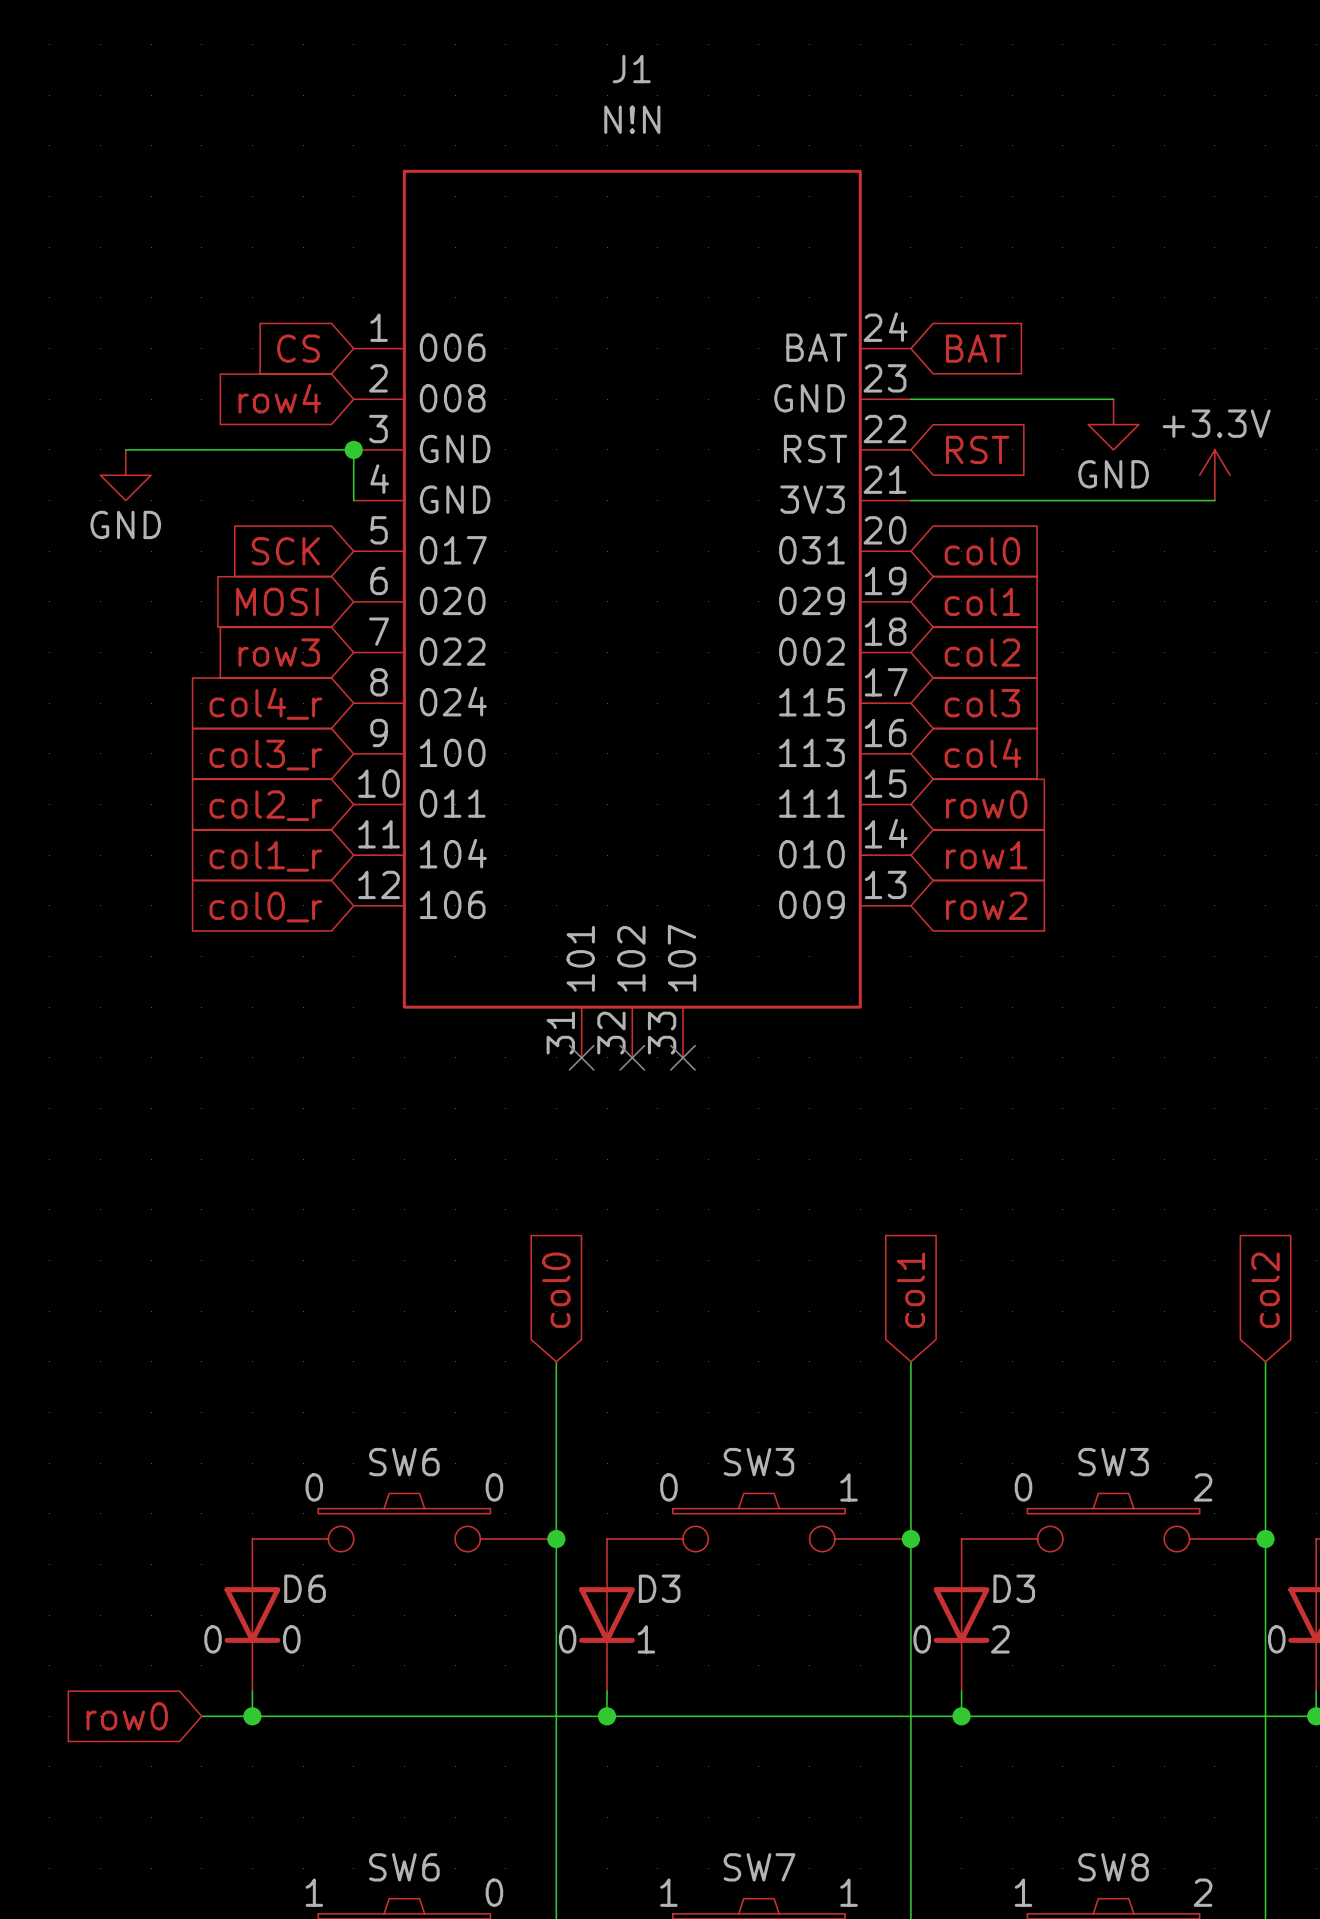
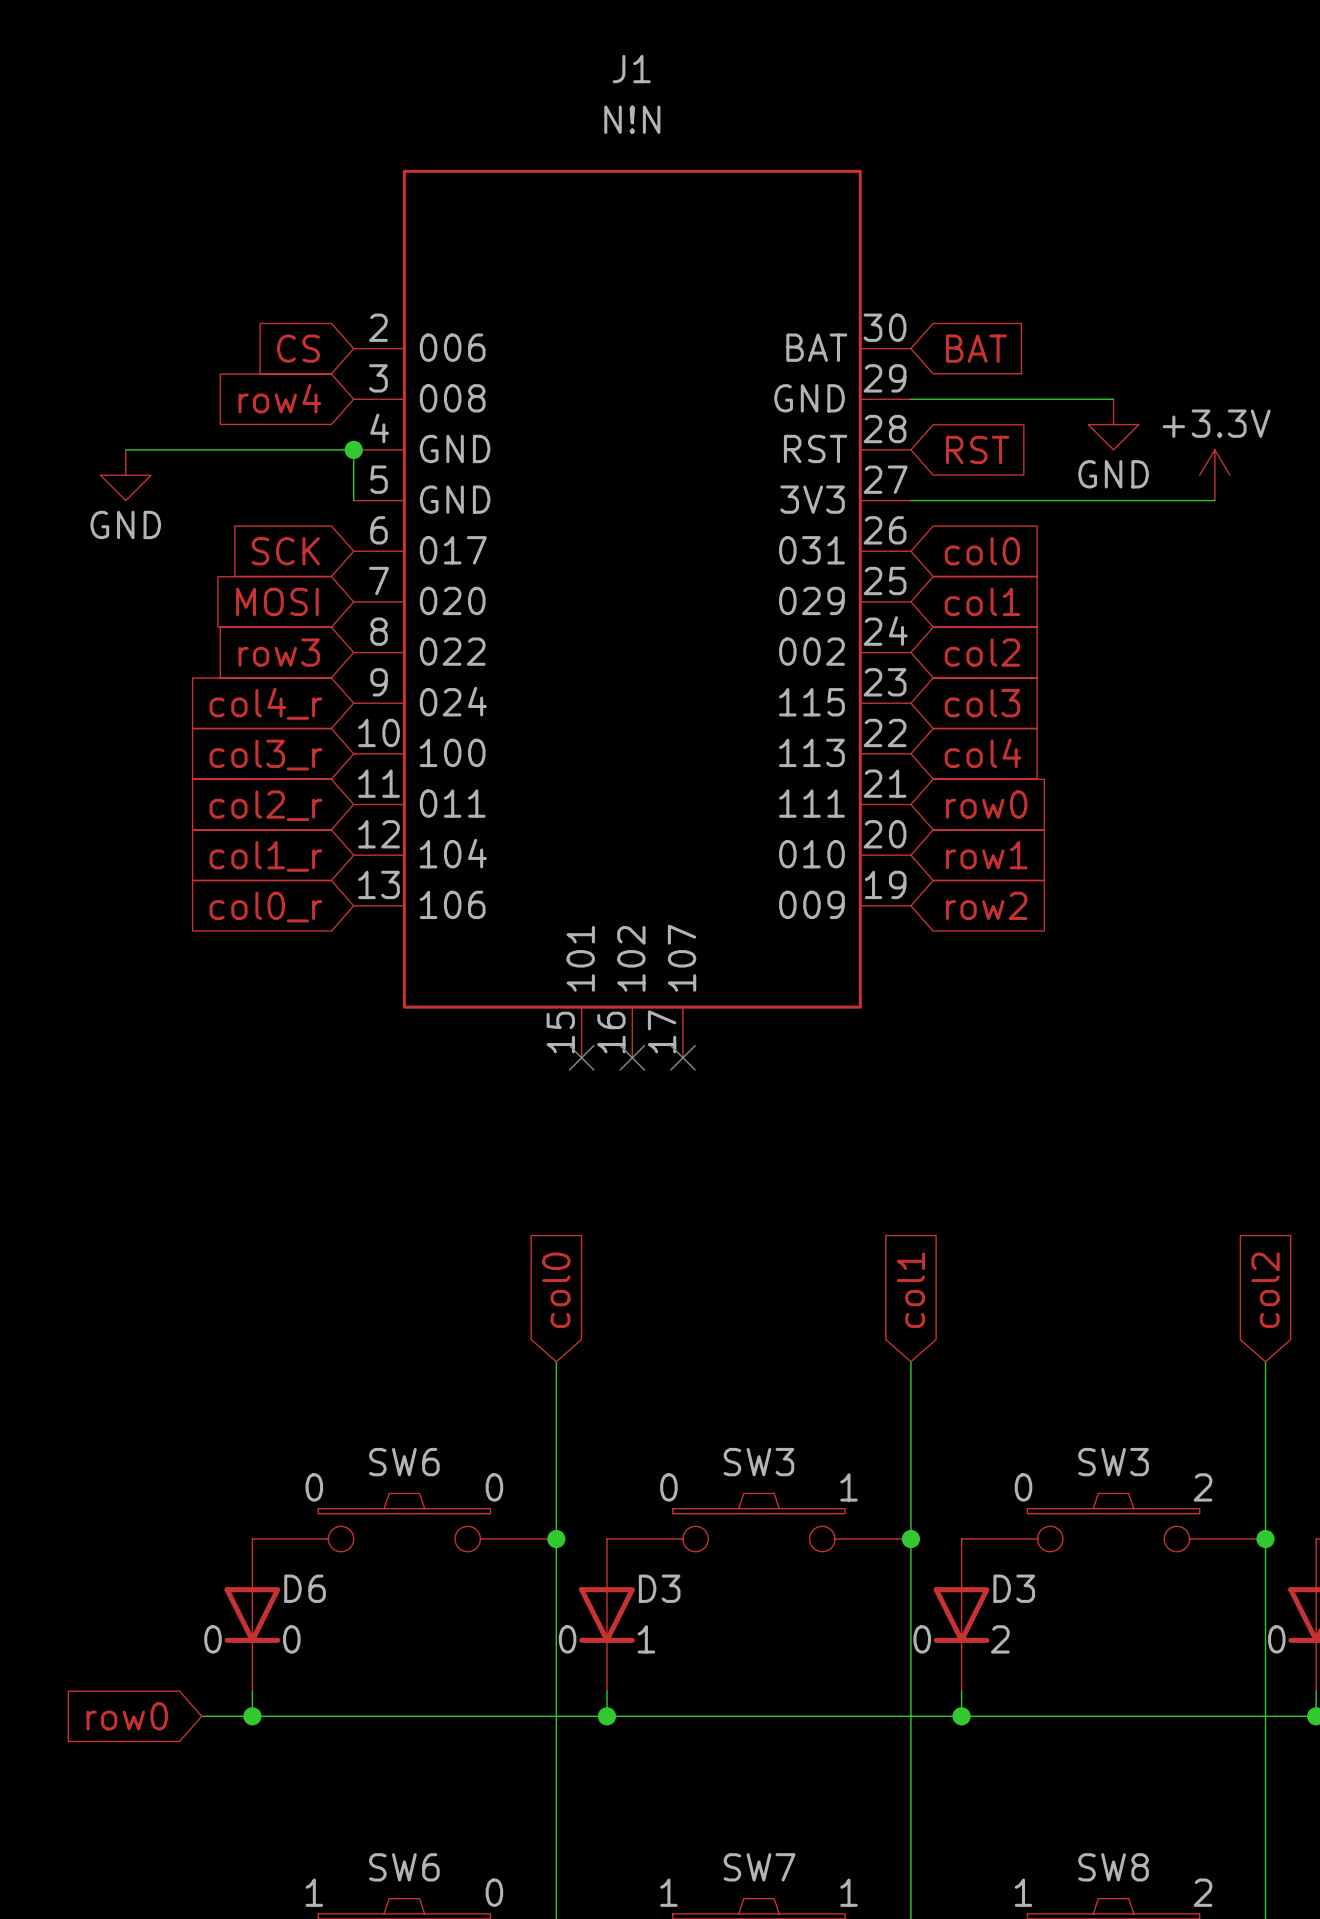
J1 symbol: [353, 169, 911, 1058] -> [353, 169, 911, 1058]

